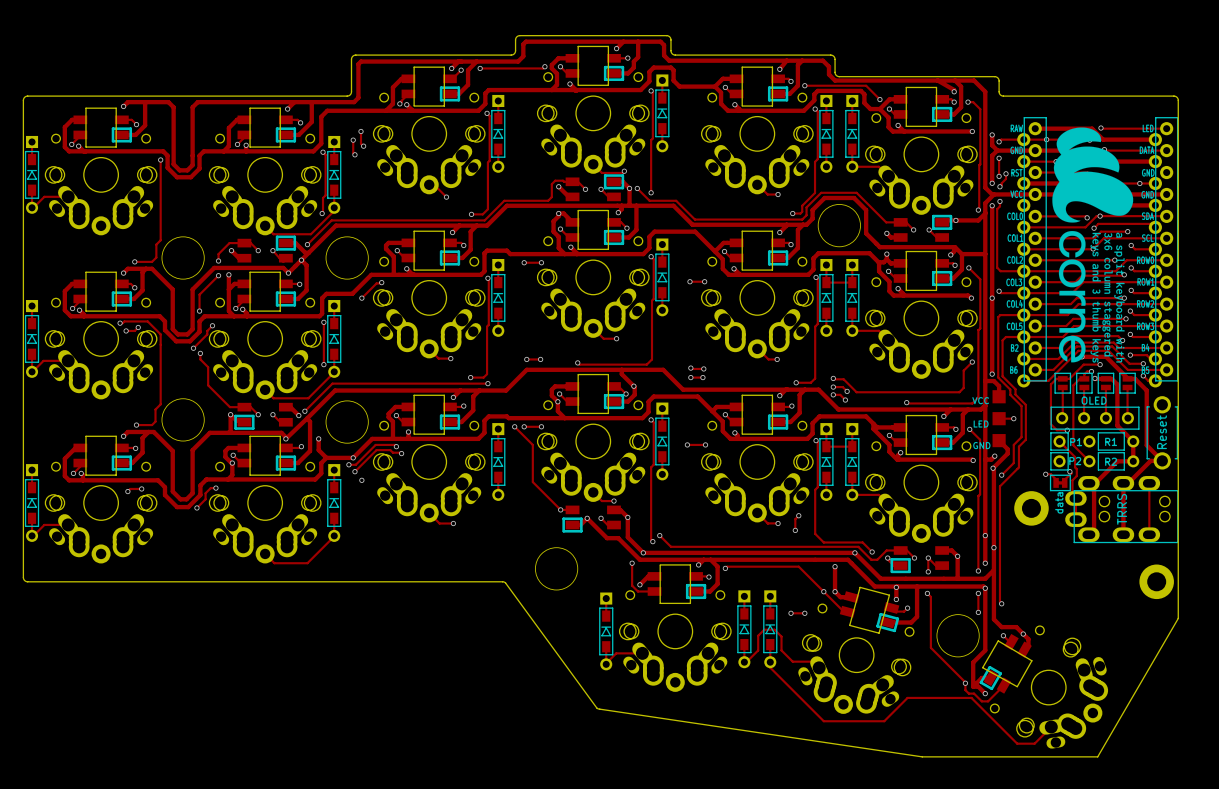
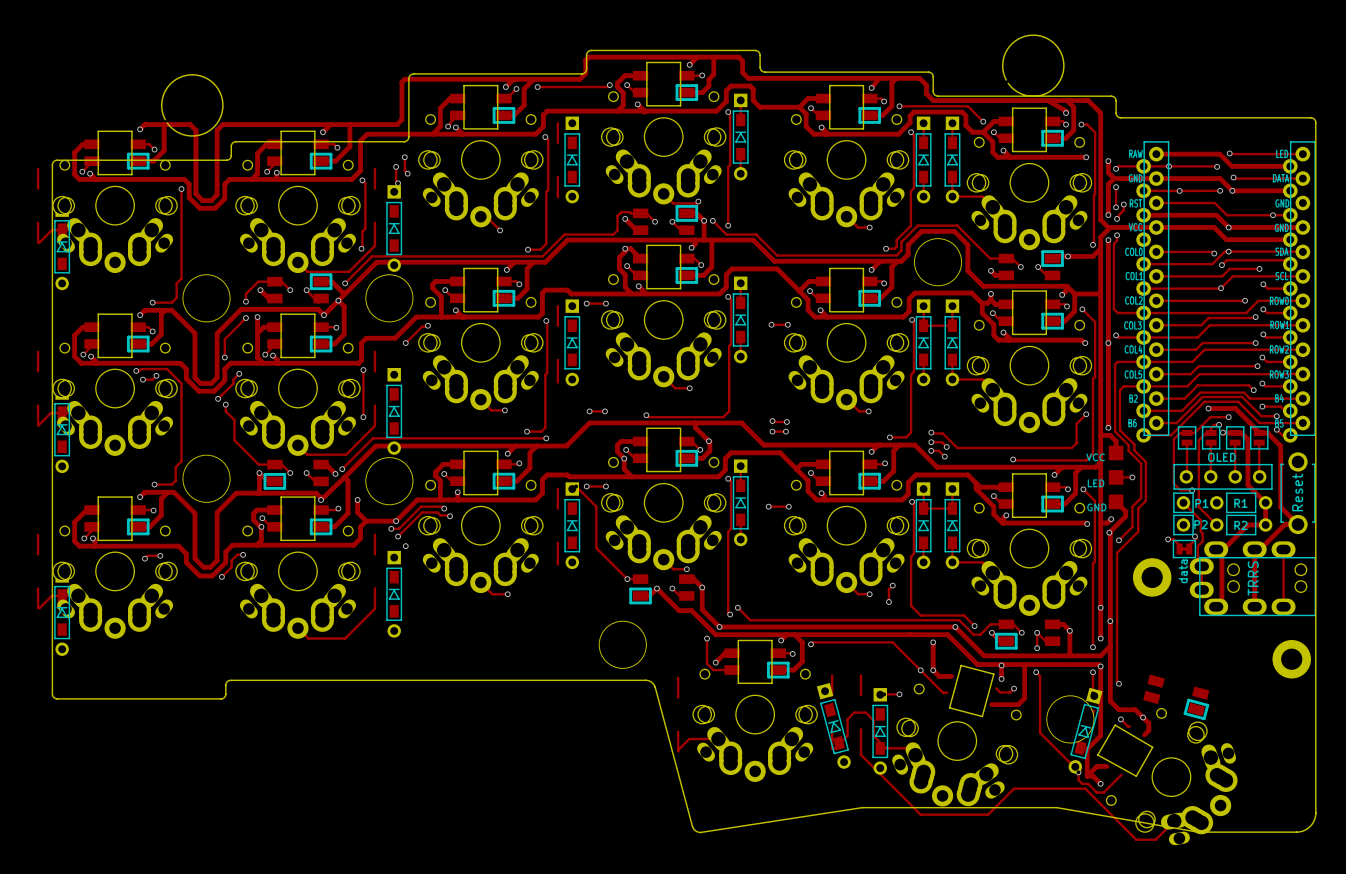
board edge: (528, 35) (516, 37) (515, 51) (511, 55) (354, 55) (351, 58) (351, 92) (347, 96) (24, 97) (24, 580) (503, 581) (598, 708) (922, 756) (1097, 756) (1178, 618) -> (591, 50) (586, 55)
board edge: (666, 35) (670, 38) (672, 53) (684, 55) -> (760, 67) (764, 72)
board edge: none -> (745, 50) (755, 50)
board edge: none -> (755, 50) (760, 55)
board edge: none -> (586, 55) (586, 70) (581, 73)
board edge: none -> (760, 55) (760, 67)
board edge: none -> (413, 73) (408, 78)
board edge: none -> (414, 73) (581, 73)
board edge: none -> (408, 79) (408, 137)
board edge: none -> (1006, 80) (1002, 68) (1003, 57) (1009, 46) (1018, 39) (1029, 35) (1040, 36) (1051, 41) (1059, 49) (1063, 60) (1063, 72) (1058, 83) (1050, 91) (1039, 95) (1027, 95) (1016, 91) (1008, 83)
board edge: none -> (165, 119) (161, 108) (162, 96) (168, 86) (177, 78) (188, 75) (199, 75) (210, 80) (218, 89) (222, 100) (222, 112) (217, 122) (209, 130) (198, 135) (186, 135) (175, 131) (167, 123)
board edge: none -> (408, 136) (404, 141)
board edge: none -> (235, 141) (404, 141)
board edge: none -> (236, 141) (231, 146)
board edge: none -> (231, 146) (231, 155)
drawing: [1052, 127, 1134, 363] -> none
board edge: none -> (231, 155) (226, 160)
part position: (498, 133) -> (572, 159)
board edge: none -> (57, 160) (52, 165)
board edge: none -> (57, 160) (226, 160)
board edge: none -> (52, 165) (52, 694) (57, 698)
part position: (32, 174) -> (62, 246)
part position: (334, 174) -> (394, 228)
part position: (498, 297) -> (572, 342)
part position: (32, 338) -> (62, 429)
part position: (334, 338) -> (394, 411)
part position: (498, 461) -> (572, 525)
part position: (32, 503) -> (62, 612)
part position: (334, 503) -> (394, 594)
board edge: none -> (230, 680) (225, 685)
board edge: none -> (230, 680) (646, 680)
board edge: none -> (645, 680) (651, 682) (655, 687)
board edge: none -> (225, 685) (225, 694)
board edge: none -> (655, 687) (692, 826)
part position: (869, 611) -> (1176, 697)
board edge: none -> (225, 694) (221, 698)
board edge: none -> (57, 698) (221, 698)
board edge: none -> (1315, 700) (1315, 813)
part: (744, 629) -> none
part: (770, 629) -> none
part: (606, 631) -> none
part: none -> (833, 725)
part: none -> (1085, 730)
part: none -> (880, 731)
part: (1005, 663) -> none
board edge: none -> (862, 807) (1056, 807) (1197, 832)
board edge: none -> (862, 807) (700, 832)
board edge: none -> (1315, 812) (1310, 826) (1296, 832)
board edge: none -> (692, 826) (695, 831) (701, 832)
board edge: none -> (1197, 832) (1296, 832)

